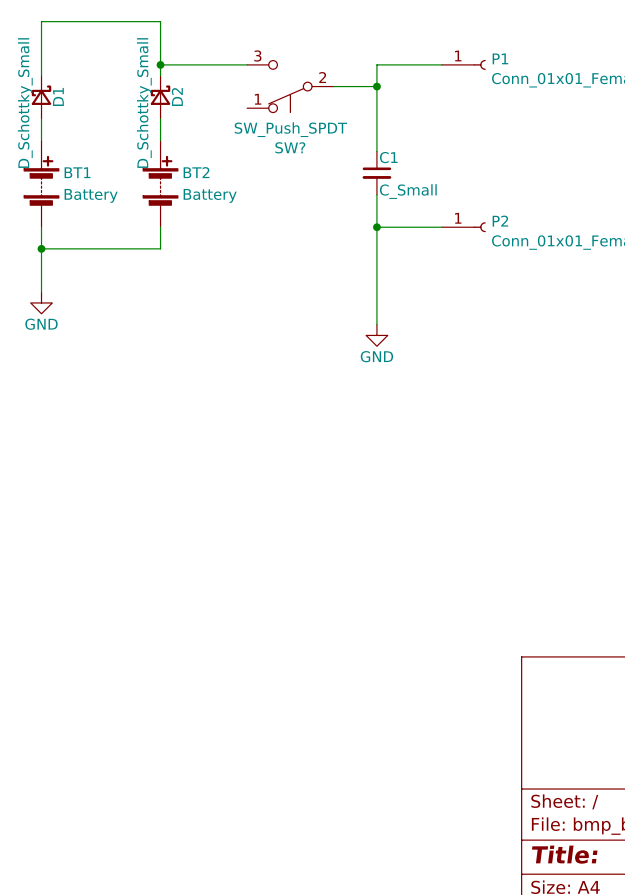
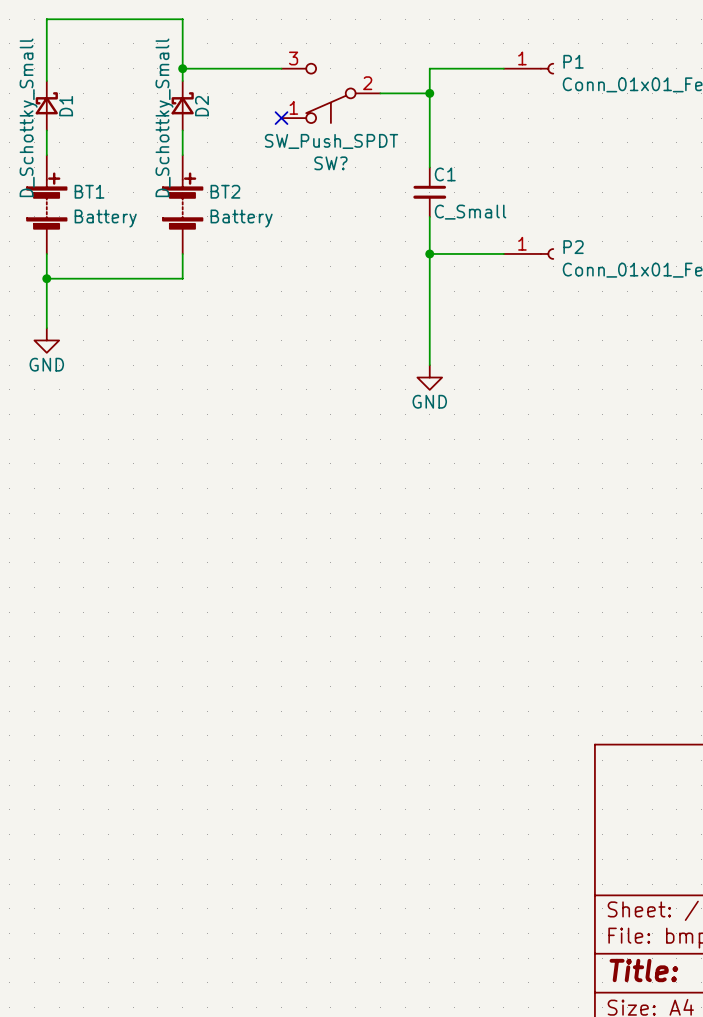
no-connect mark: none -> (281, 118)

